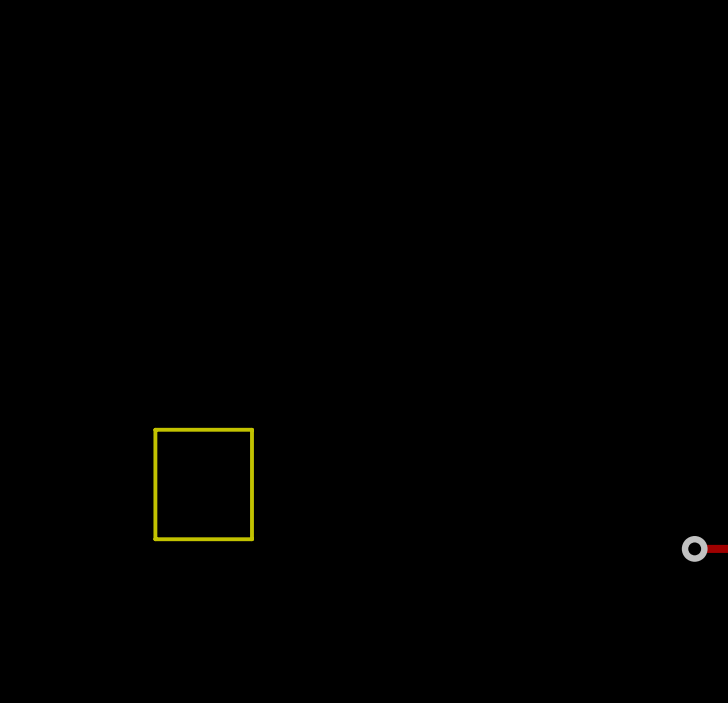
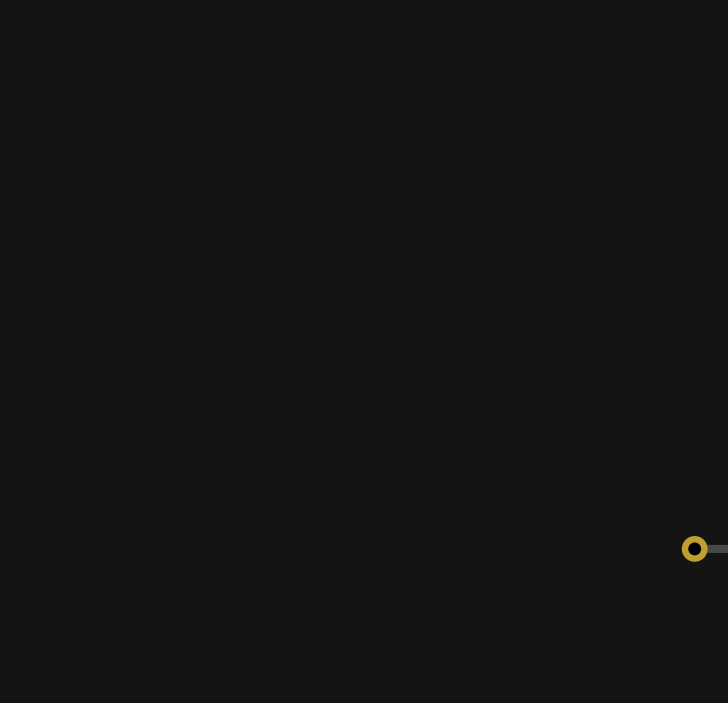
part: (203, 484) -> none

